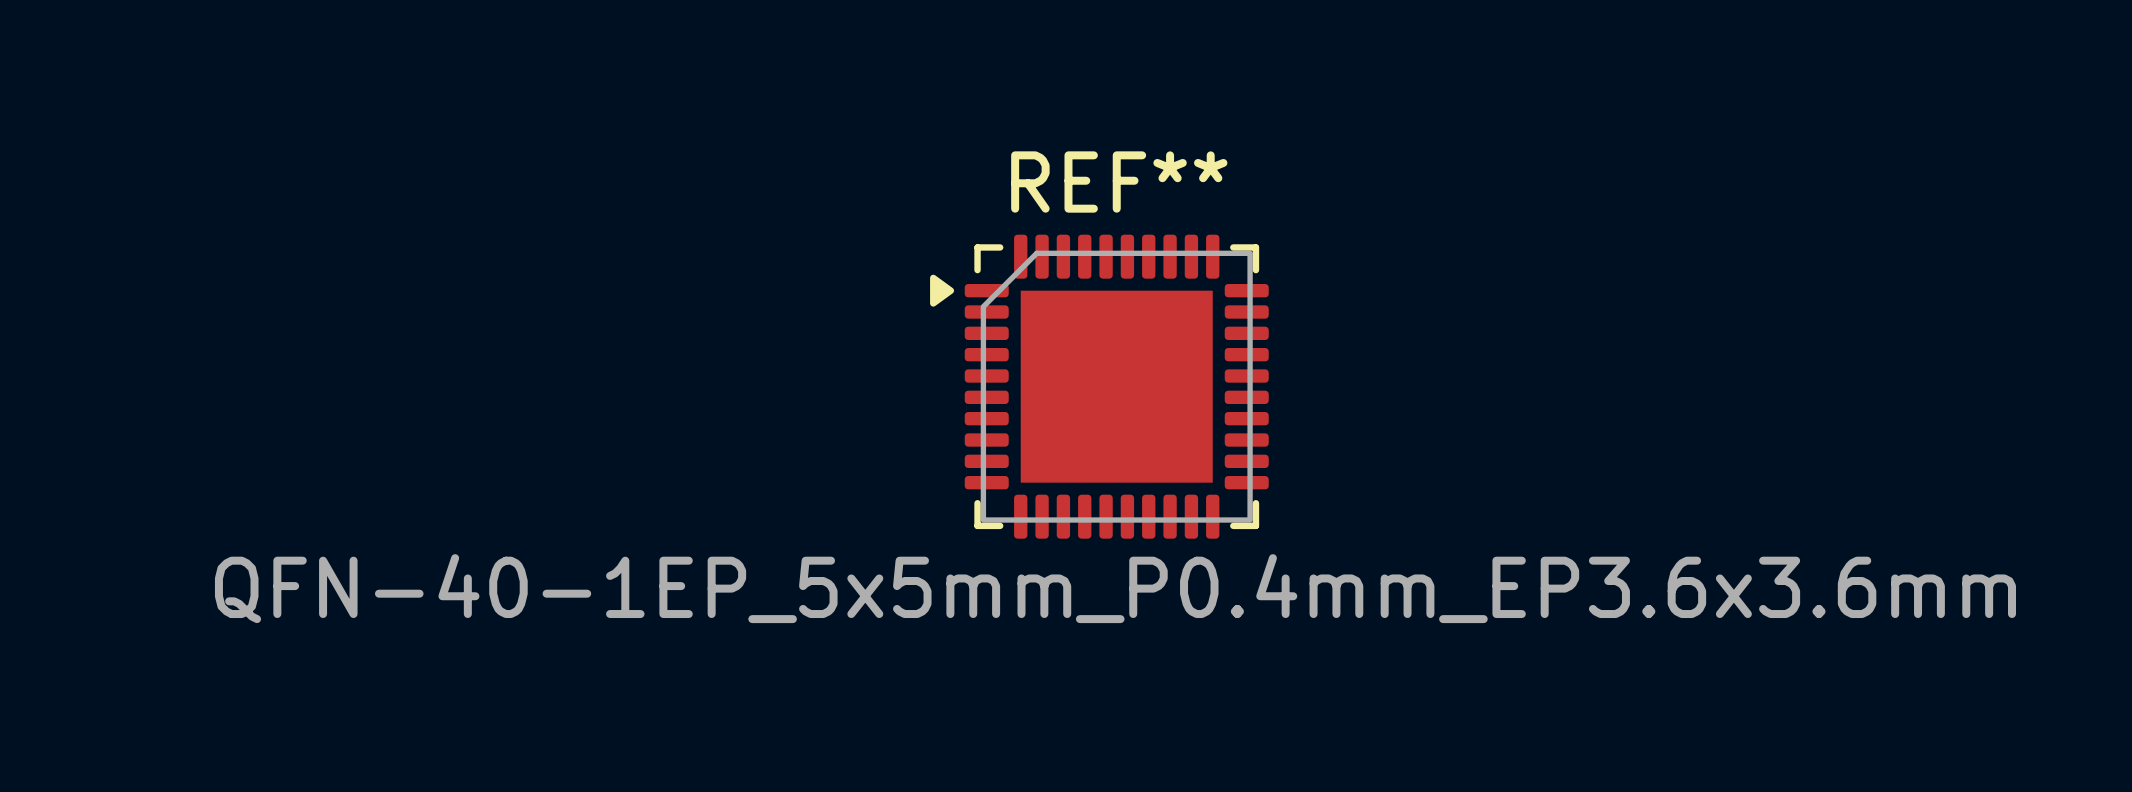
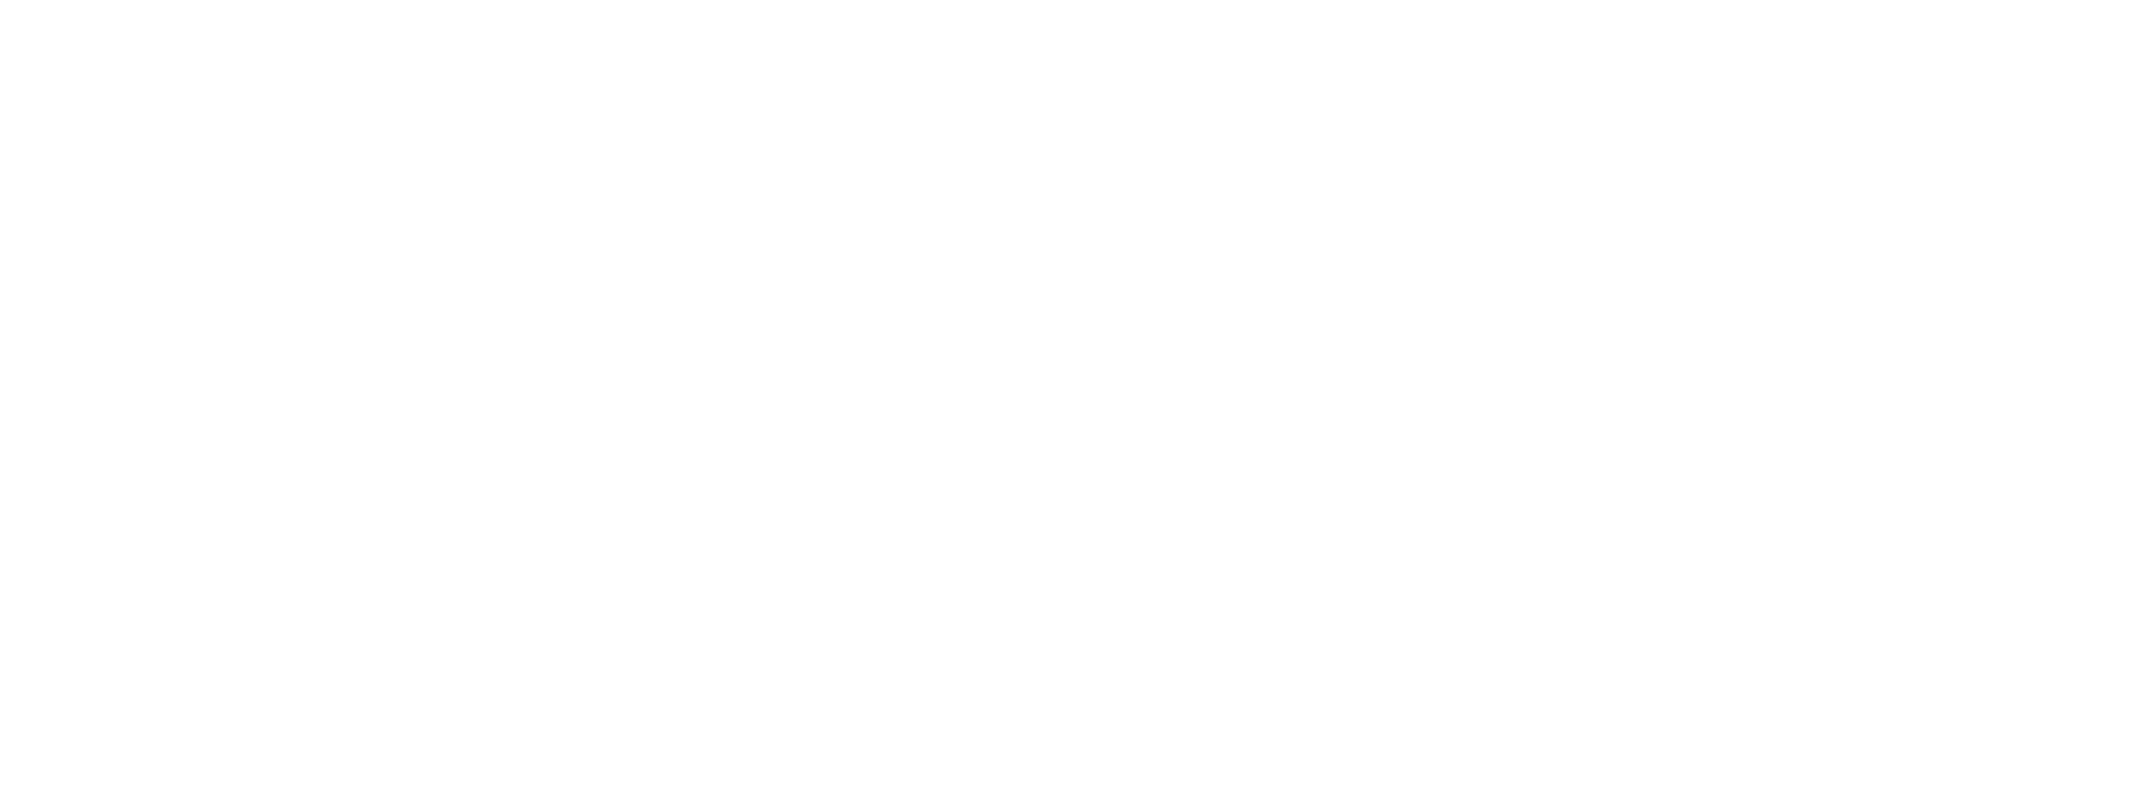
REF**: QFN-40-1EP_5x5mm_P0.4mm_EP3.6x3.6mm (1099, 386) -> none

